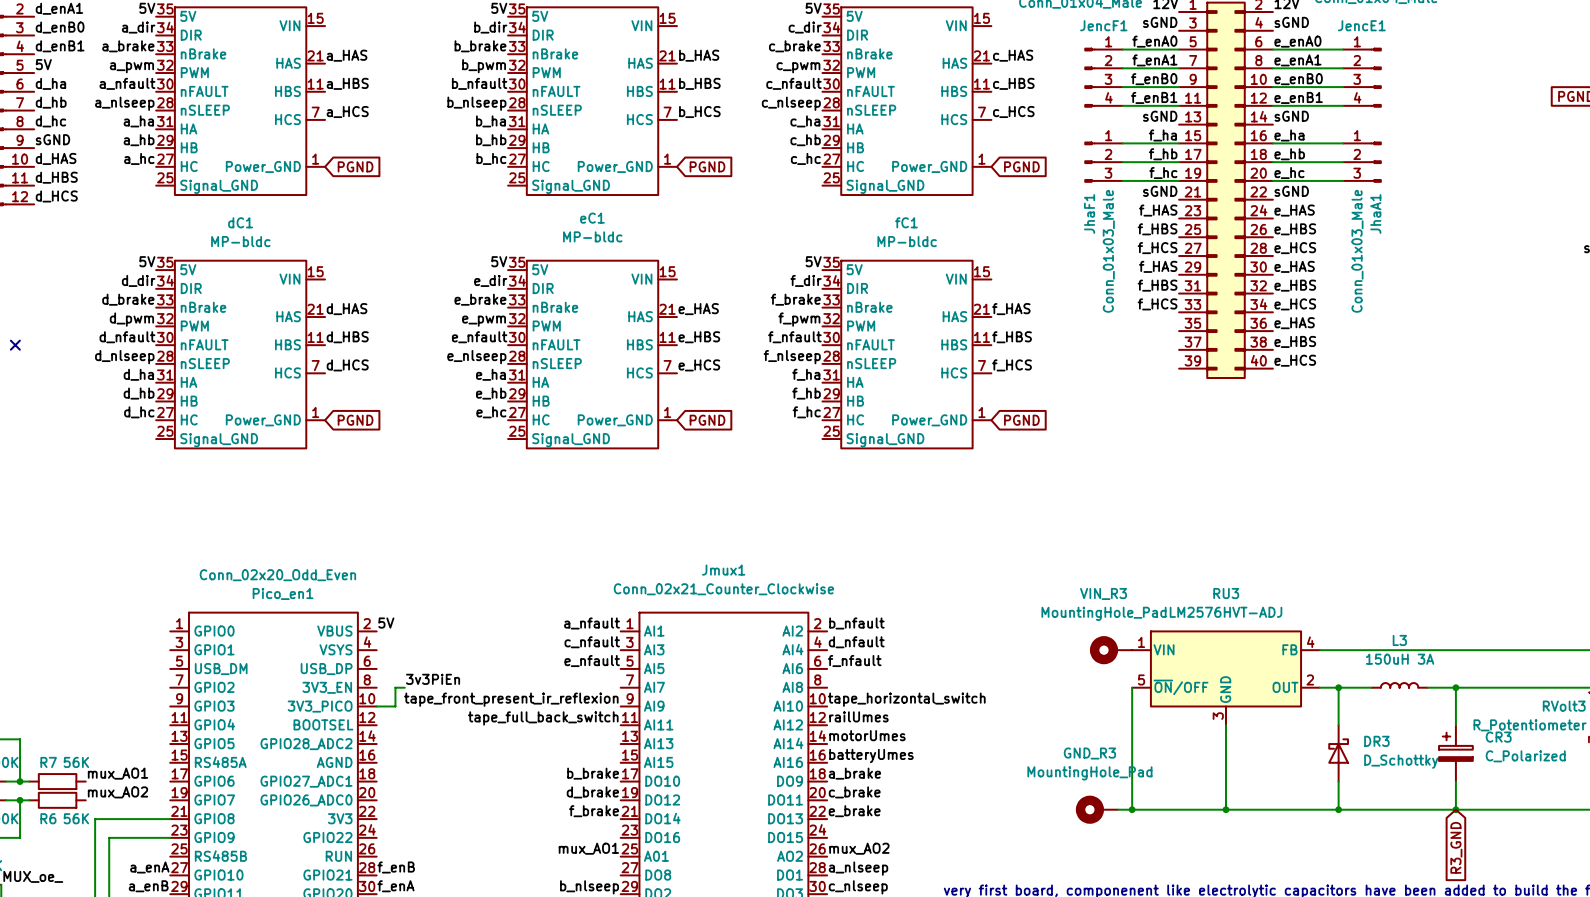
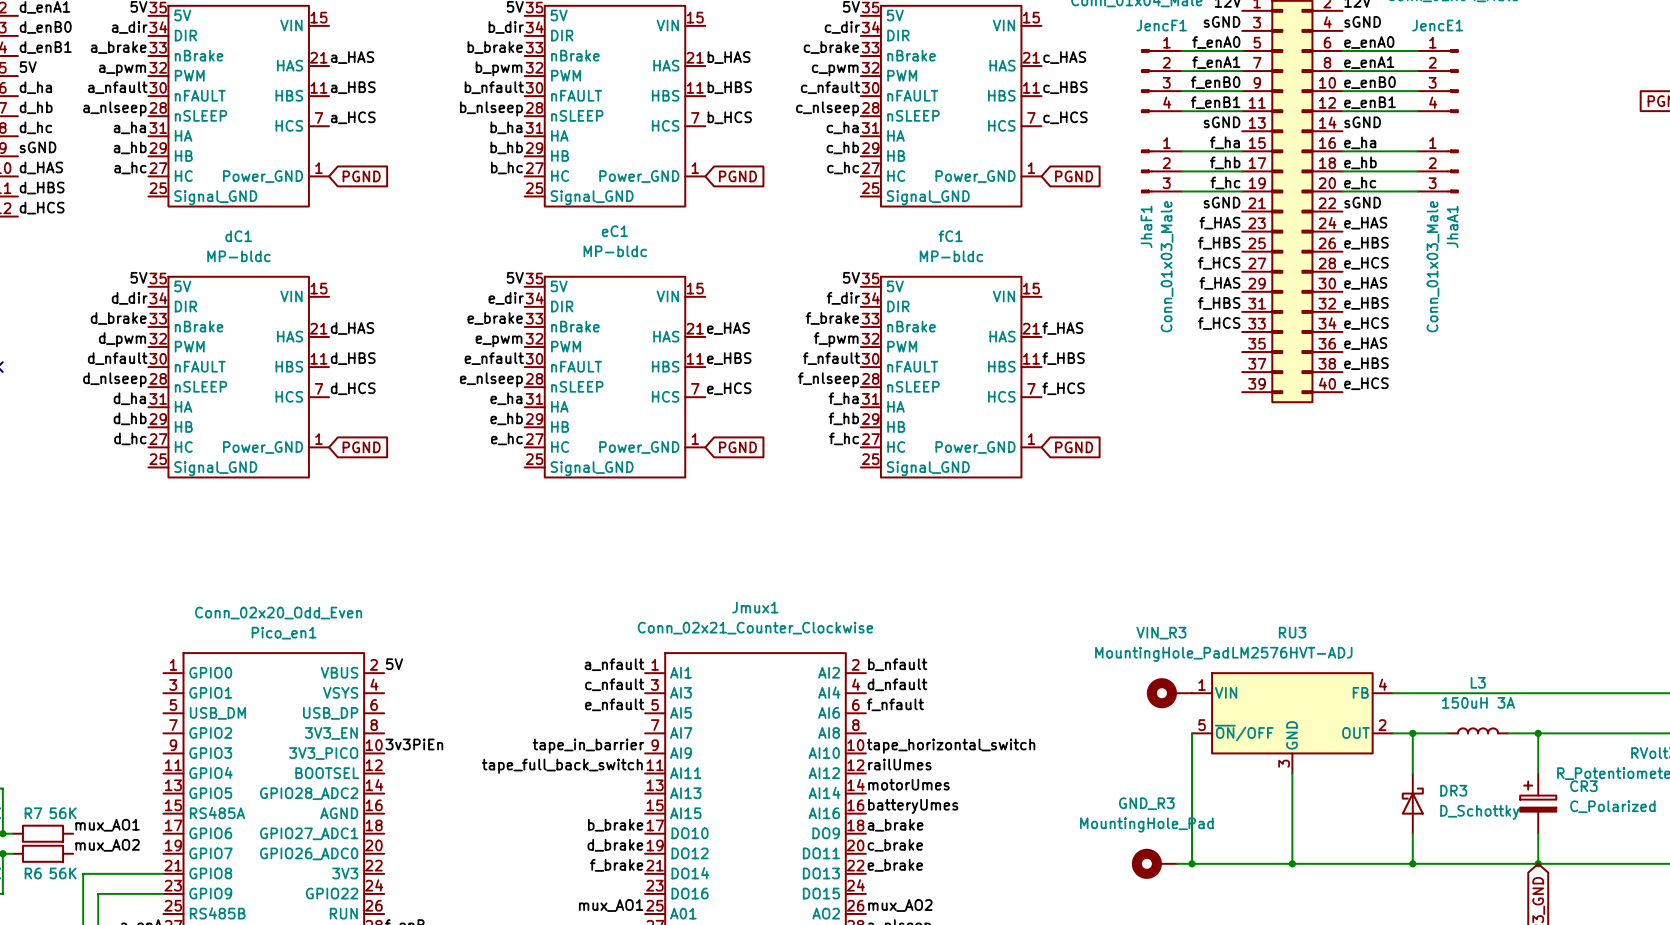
label position: 3v3PiEn (433, 679) -> 3v3PiEn (414, 744)
wire: (404, 687) (395, 687) (395, 706) (376, 706) -> none
label: tape_front_present_ir_reflexion (511, 699) -> tape_in_barrier (588, 746)

